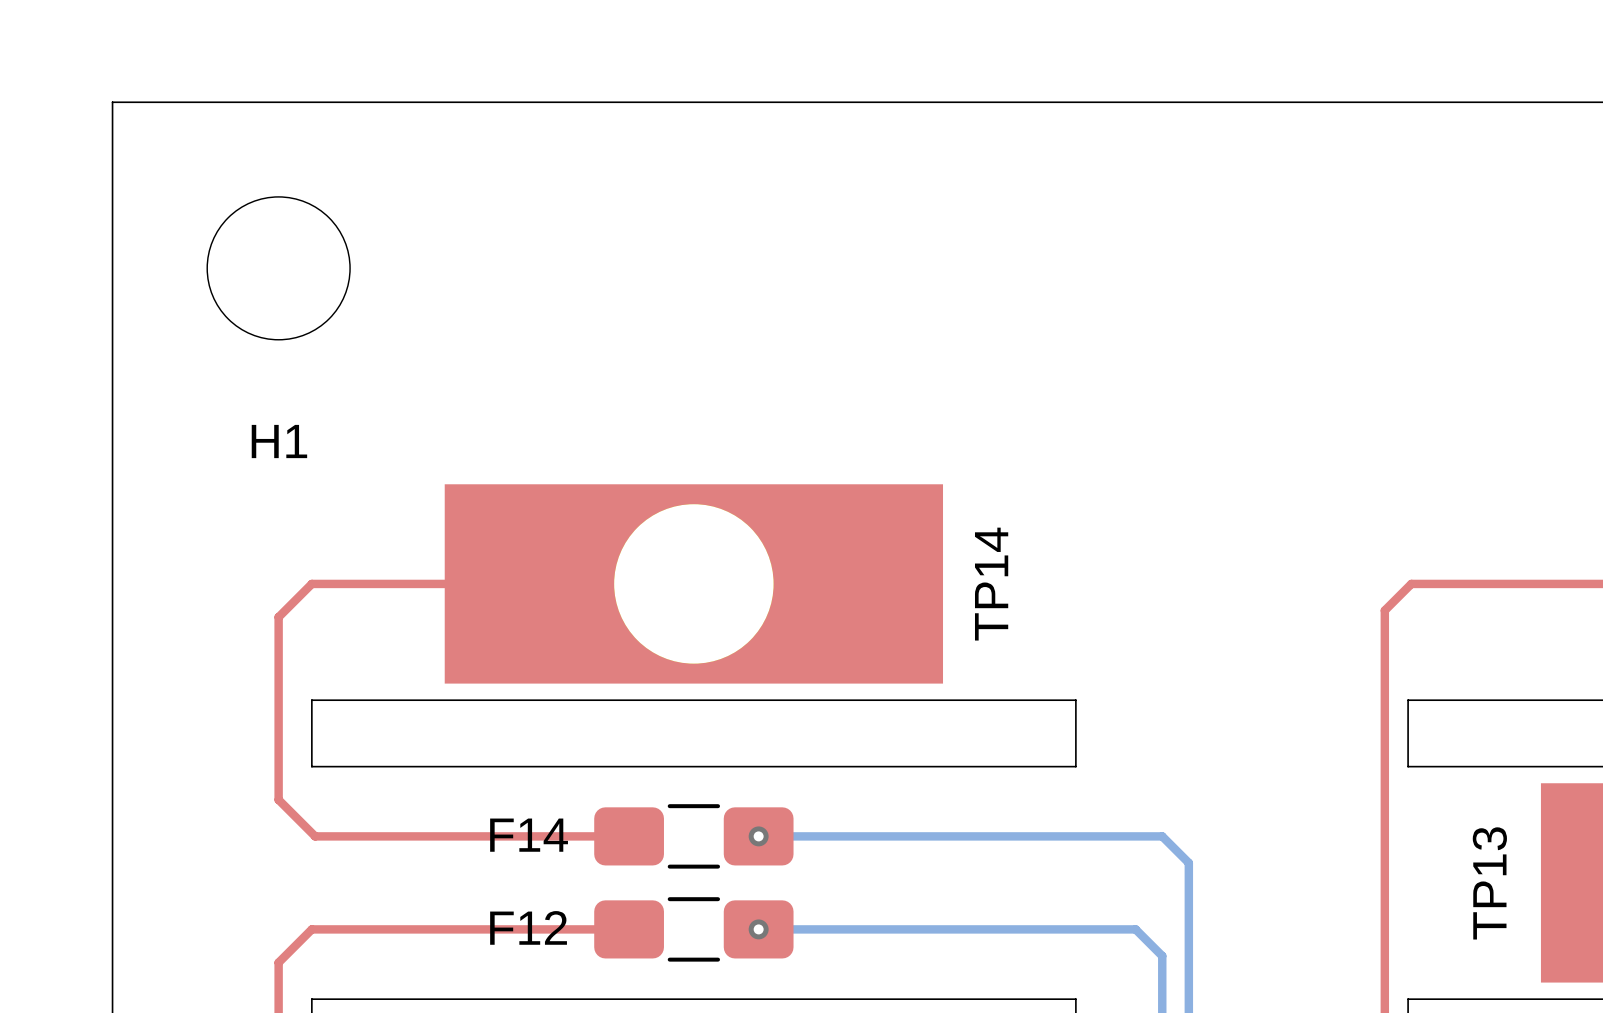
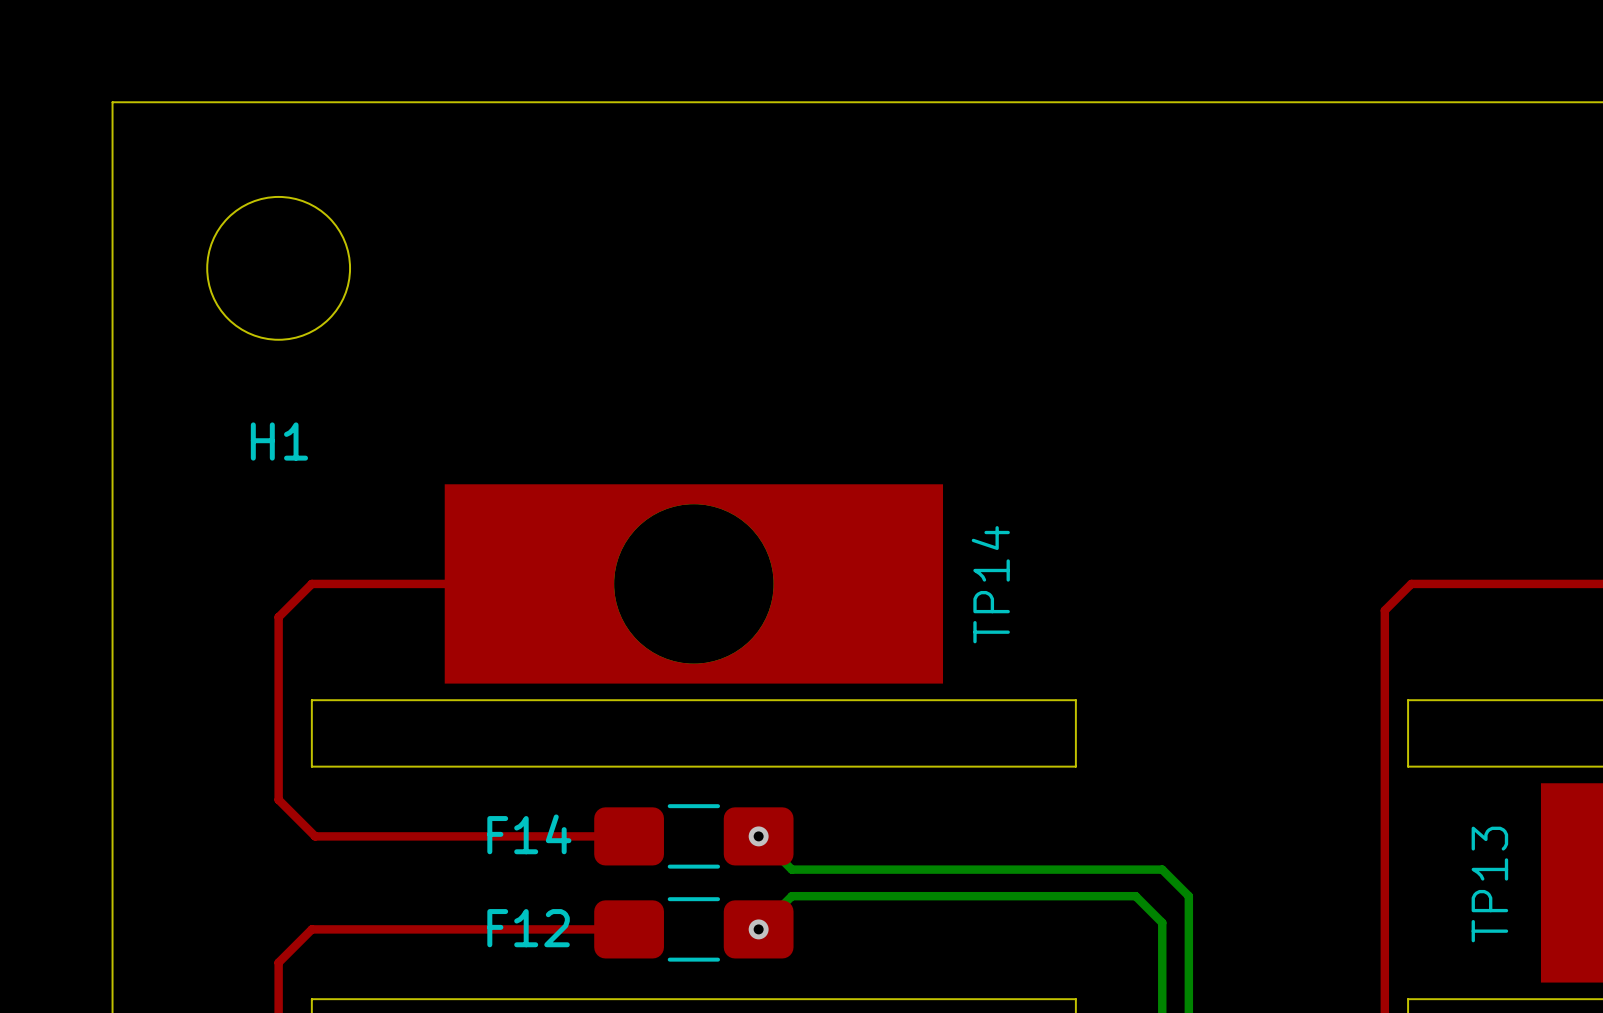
bottom track: (758, 836) (1162, 836) (1188, 862) (1188, 896) -> (758, 836) (791, 869) (1162, 869) (1188, 896)
bottom track: (758, 929) (1135, 929) (1162, 955) -> (758, 929) (791, 896) (1135, 896) (1162, 922) (1162, 955)

